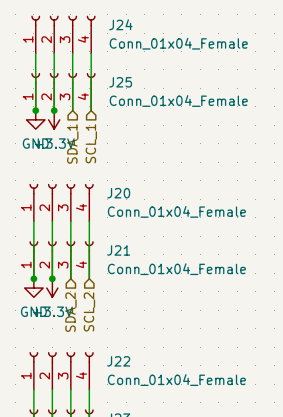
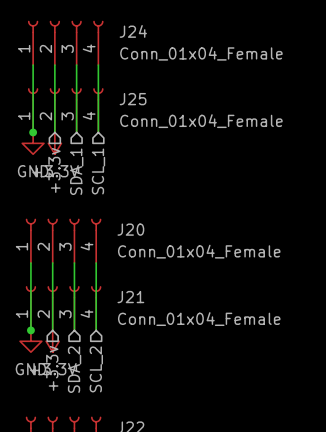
junction: (54, 110) -> none
hierarchical label: none -> +3.3v (54, 170)
junction: (52, 278) -> none
hierarchical label: none -> +3.3v (52, 368)

